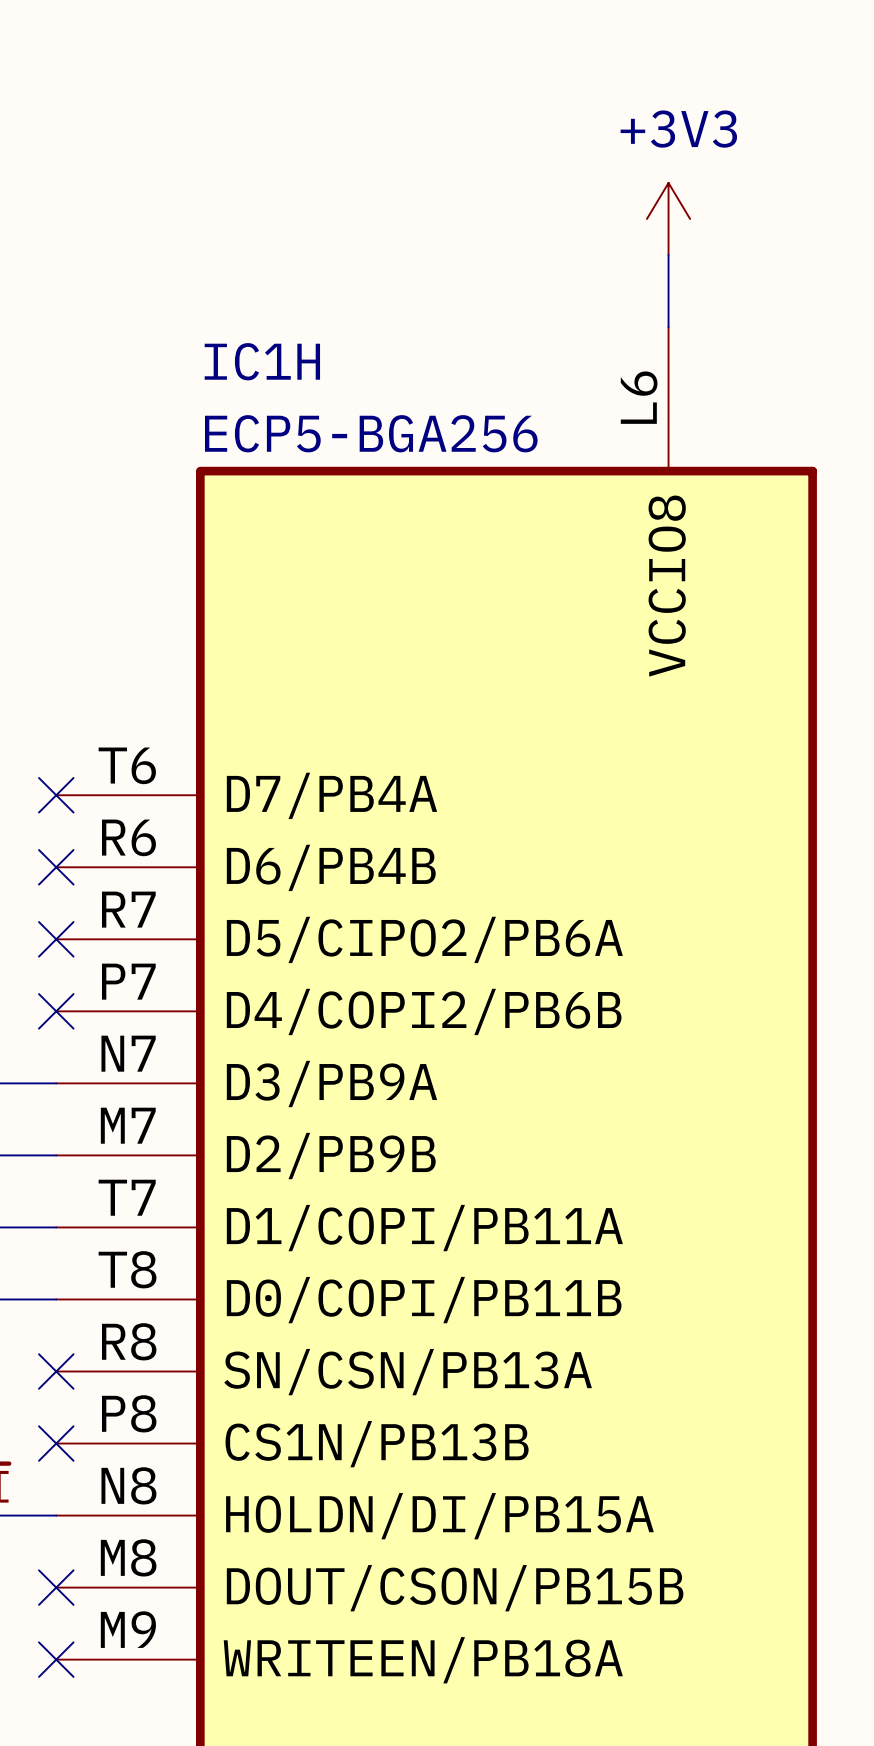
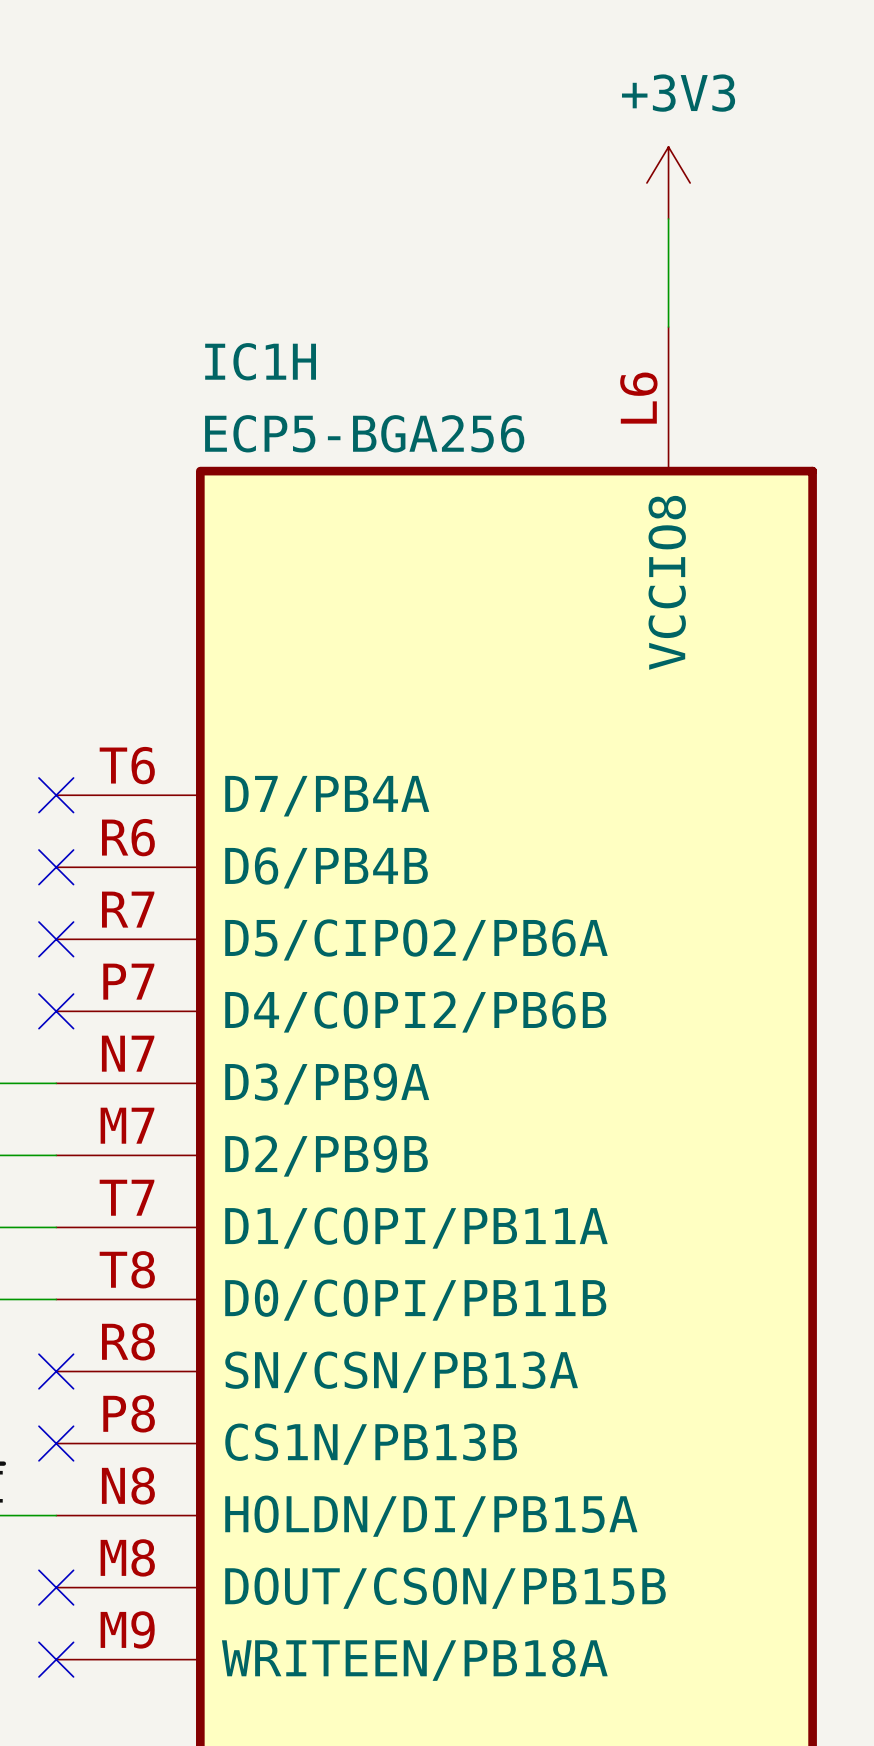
power symbol position: +3V3 (668, 219) -> +3V3 (668, 182)

